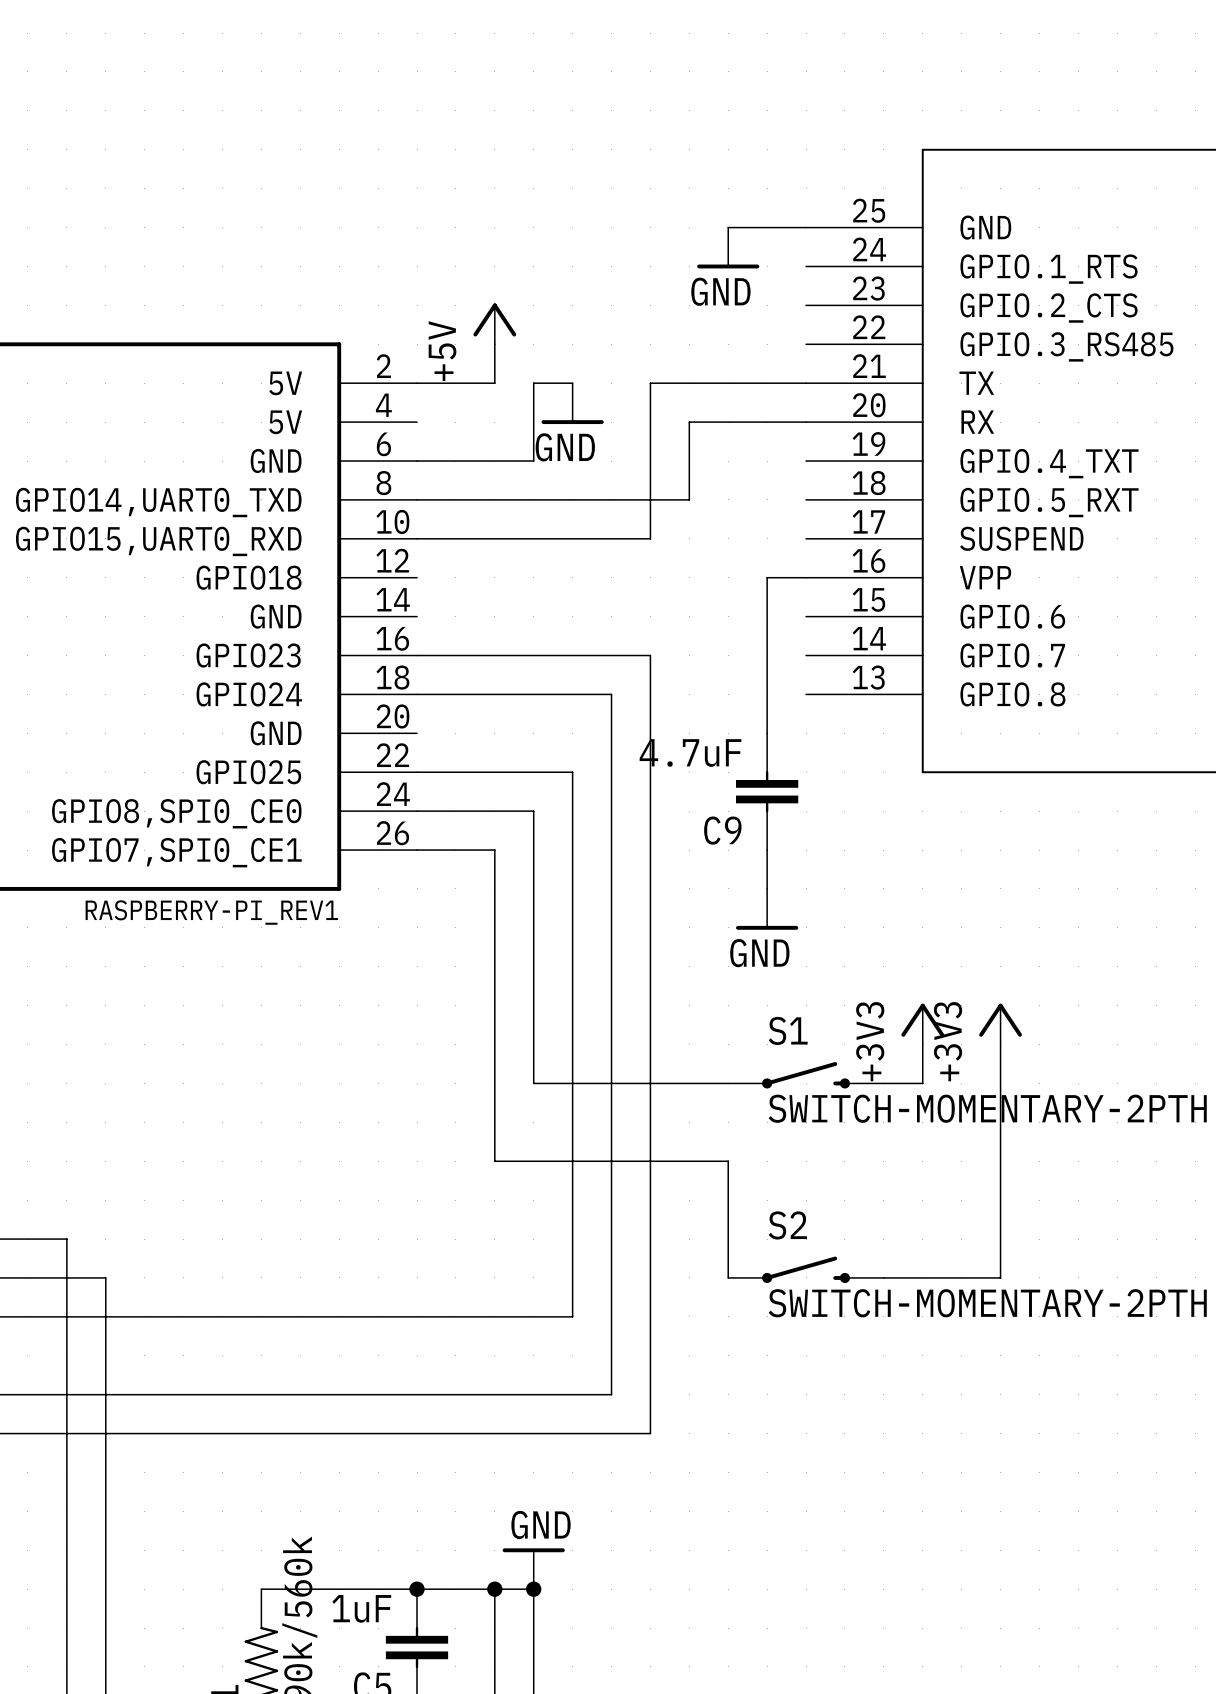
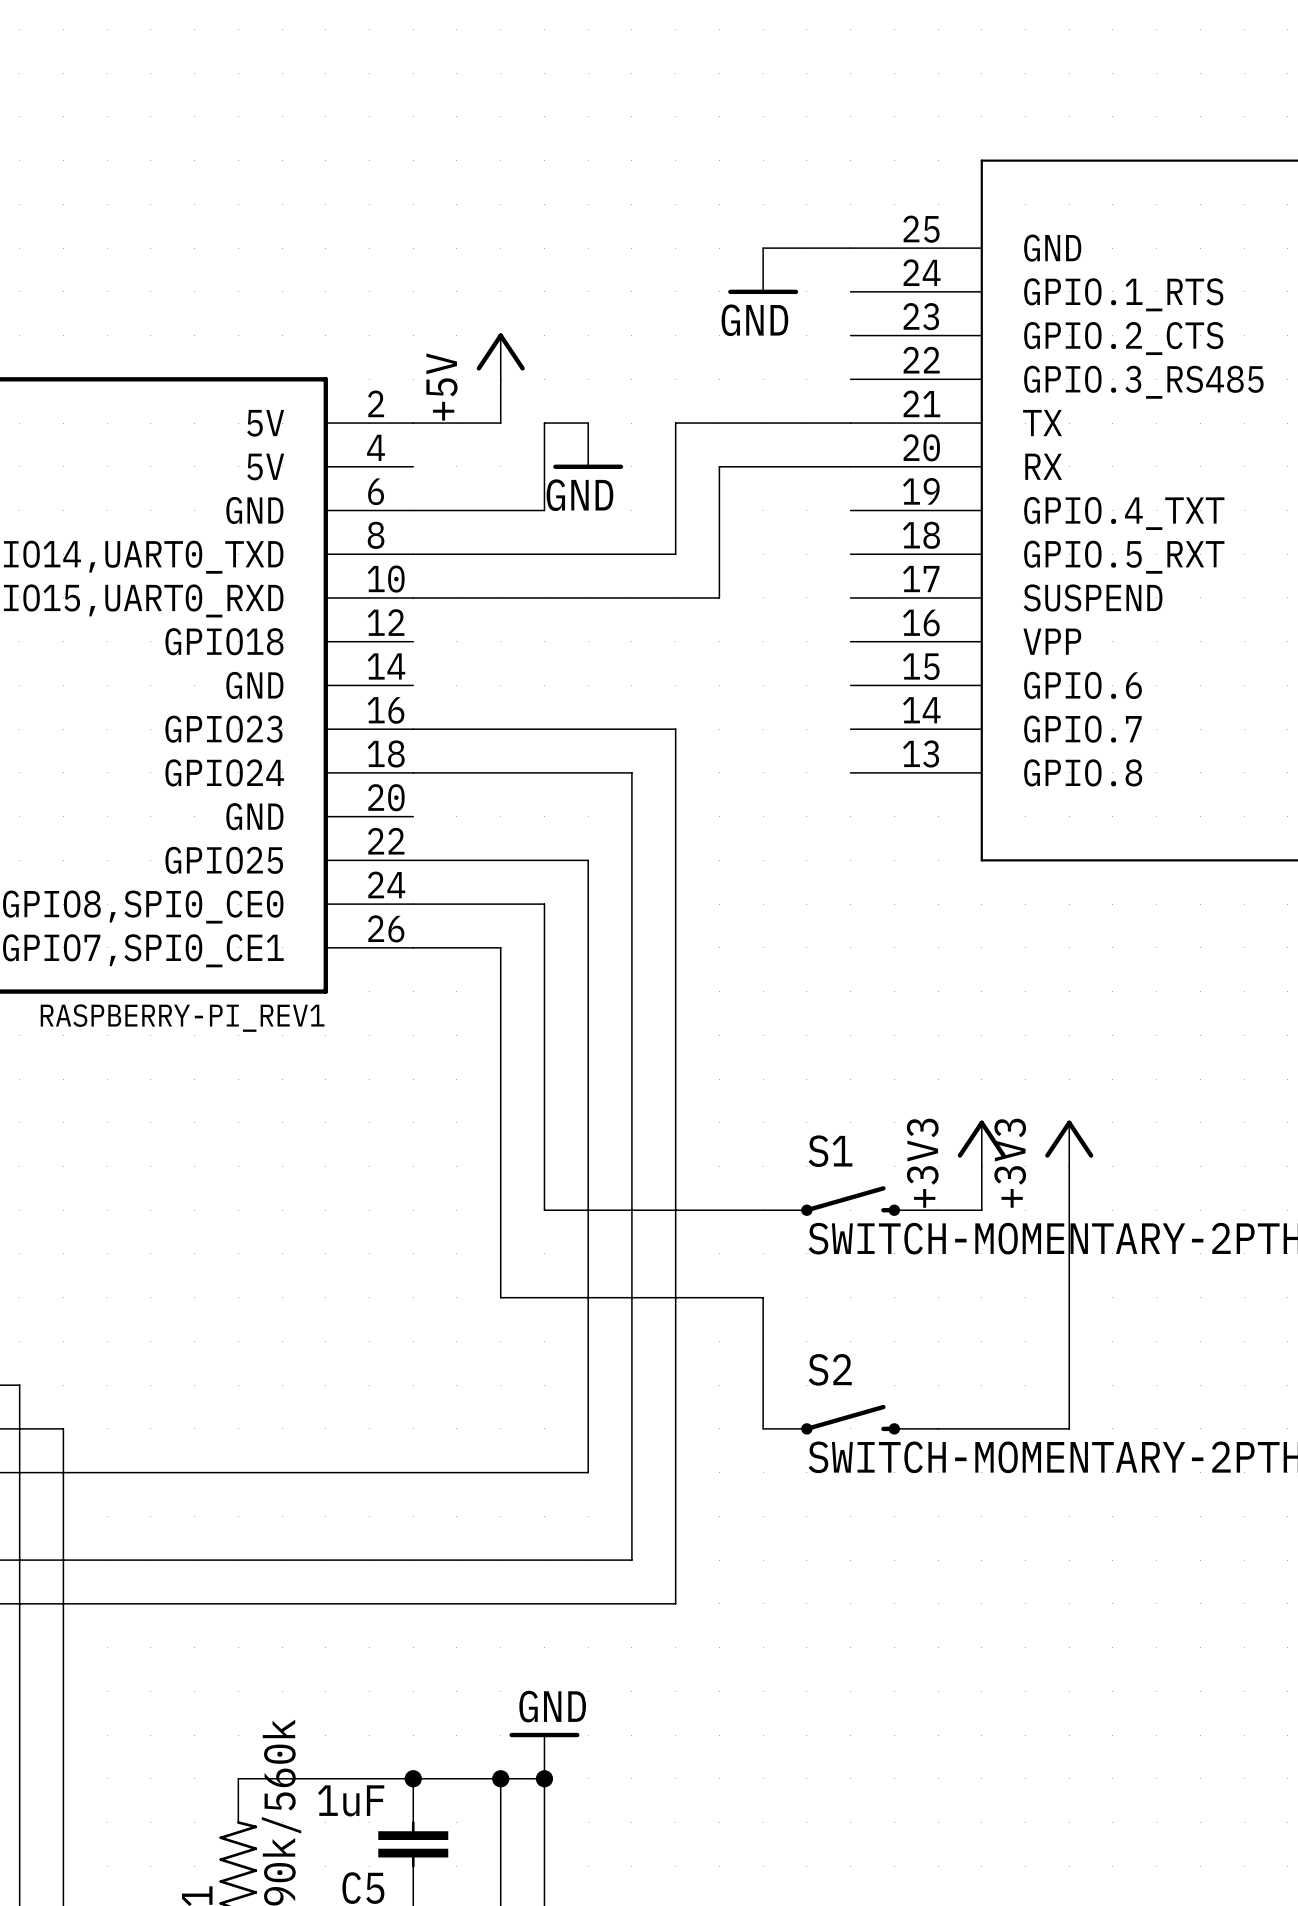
wire: (689, 499) (650, 499) (650, 538) -> (719, 554) (719, 597) (675, 597)
wire: (806, 577) (767, 577) (767, 733) -> none
C9: 4.7uF (767, 791) -> none
wire: (767, 850) (767, 888) -> none
power symbol: GND (767, 909) -> none

